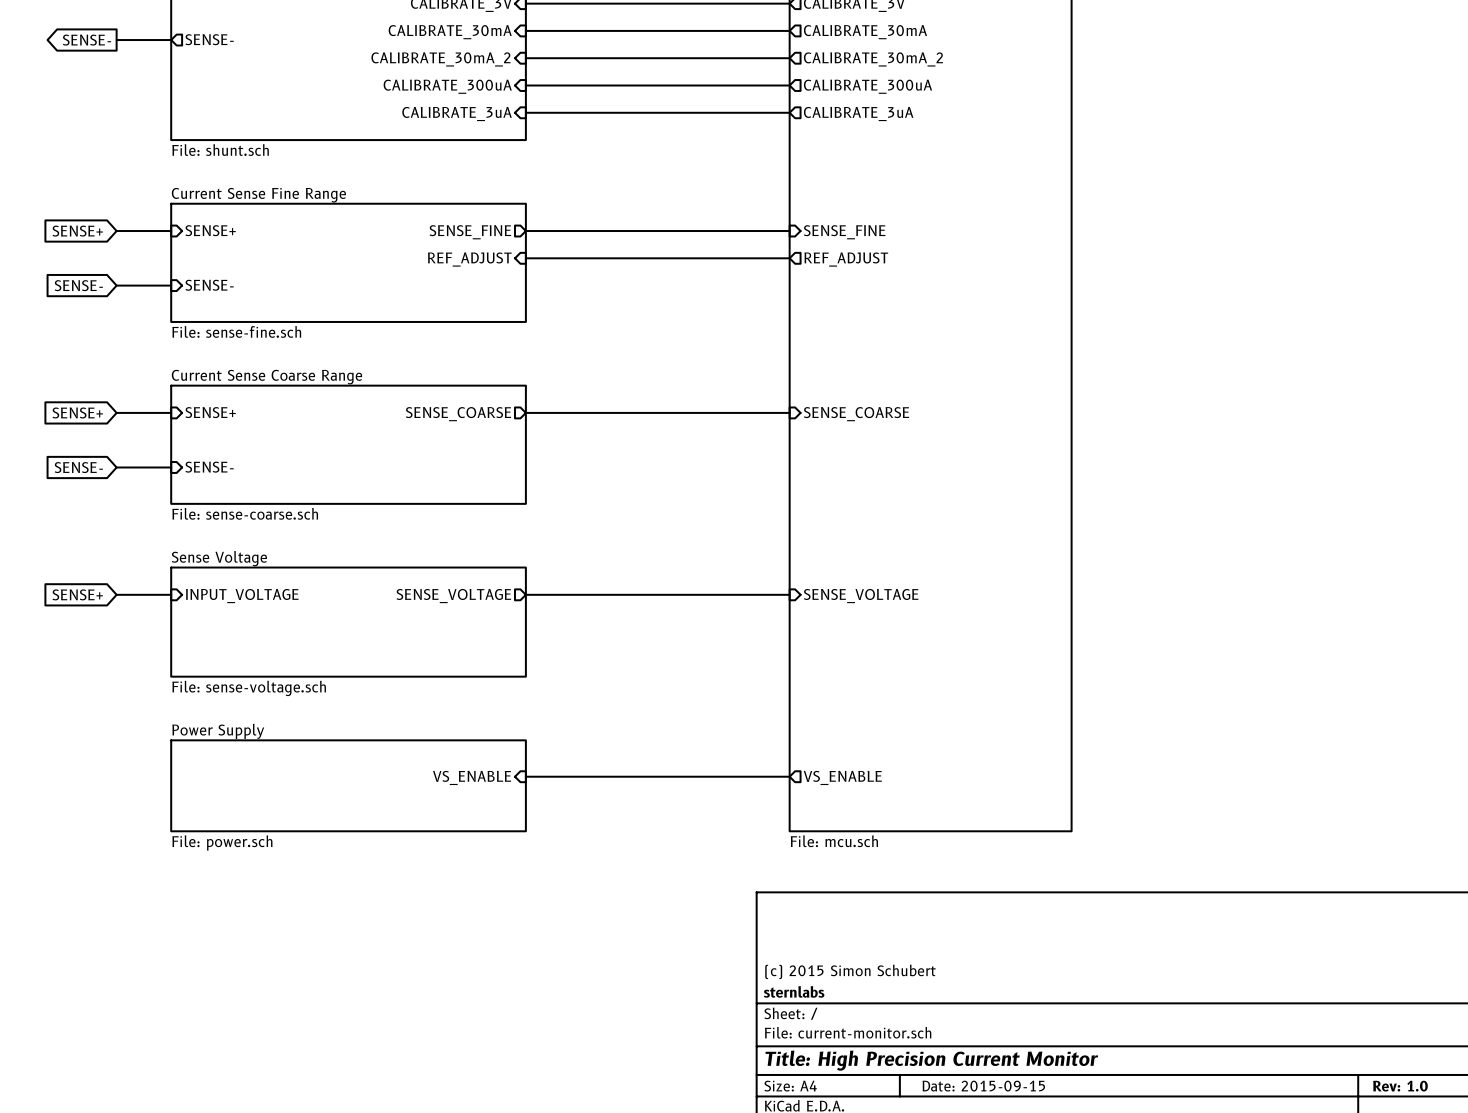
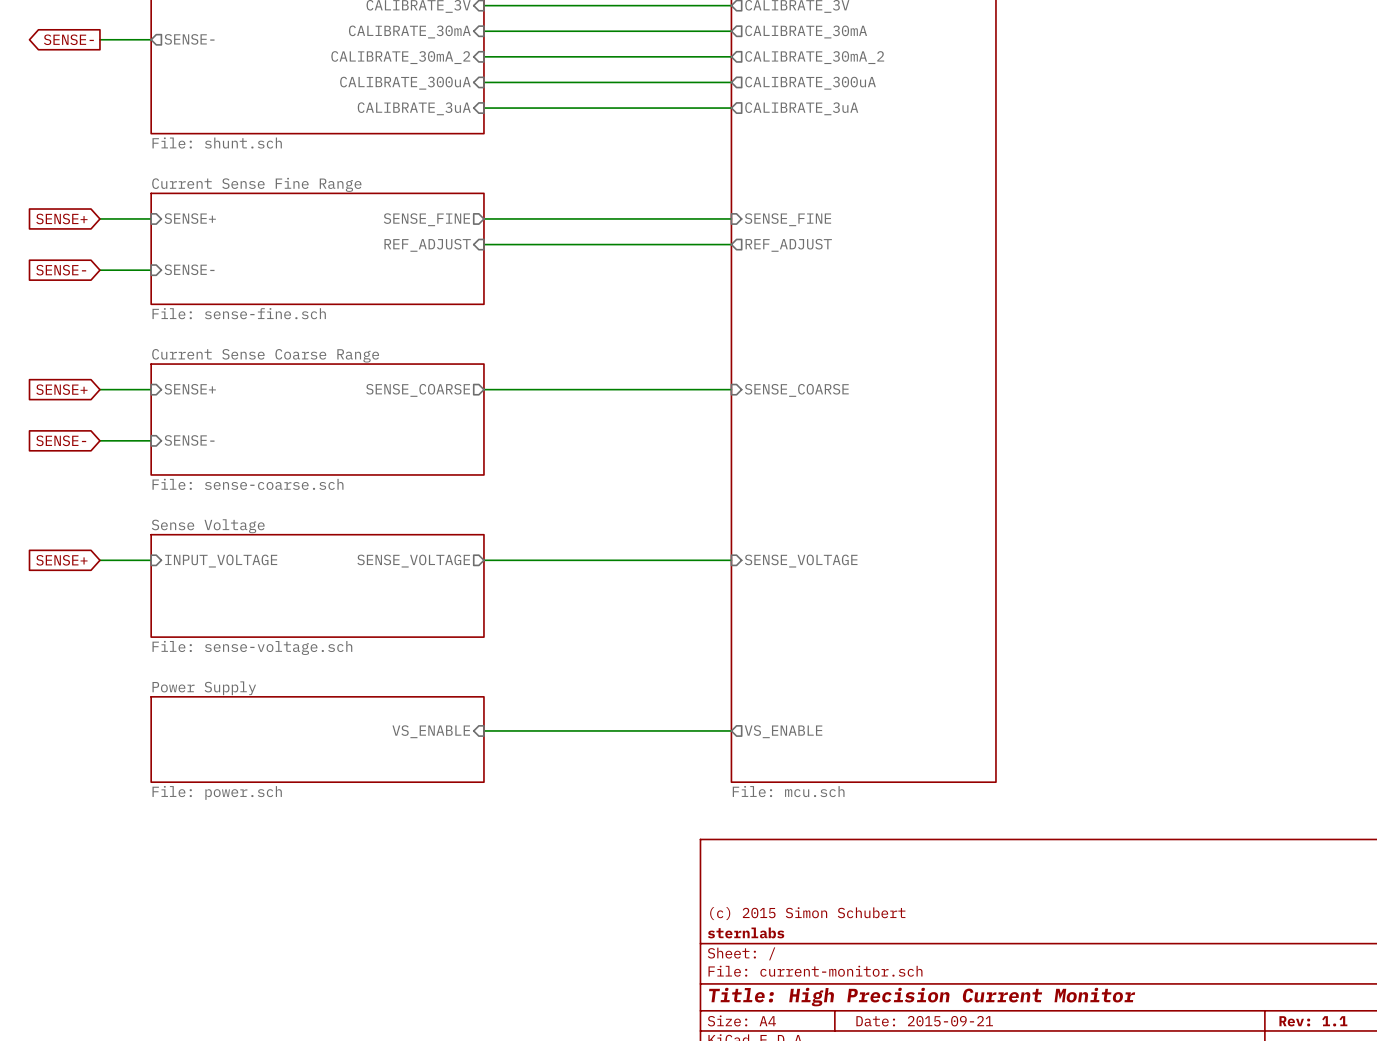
title block: Date: 2015-09-15 (983, 1086) -> Date: 2015-09-21 (924, 1021)
title block: Rev: 1.0 (1400, 1086) -> Rev: 1.1 (1313, 1021)

